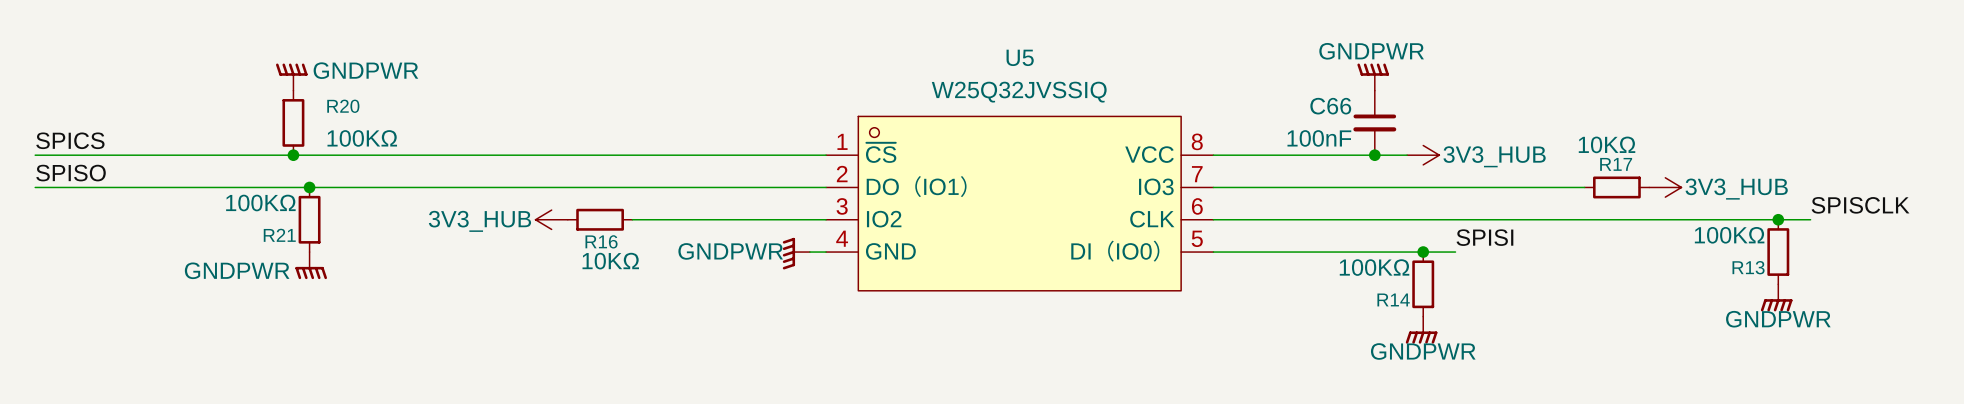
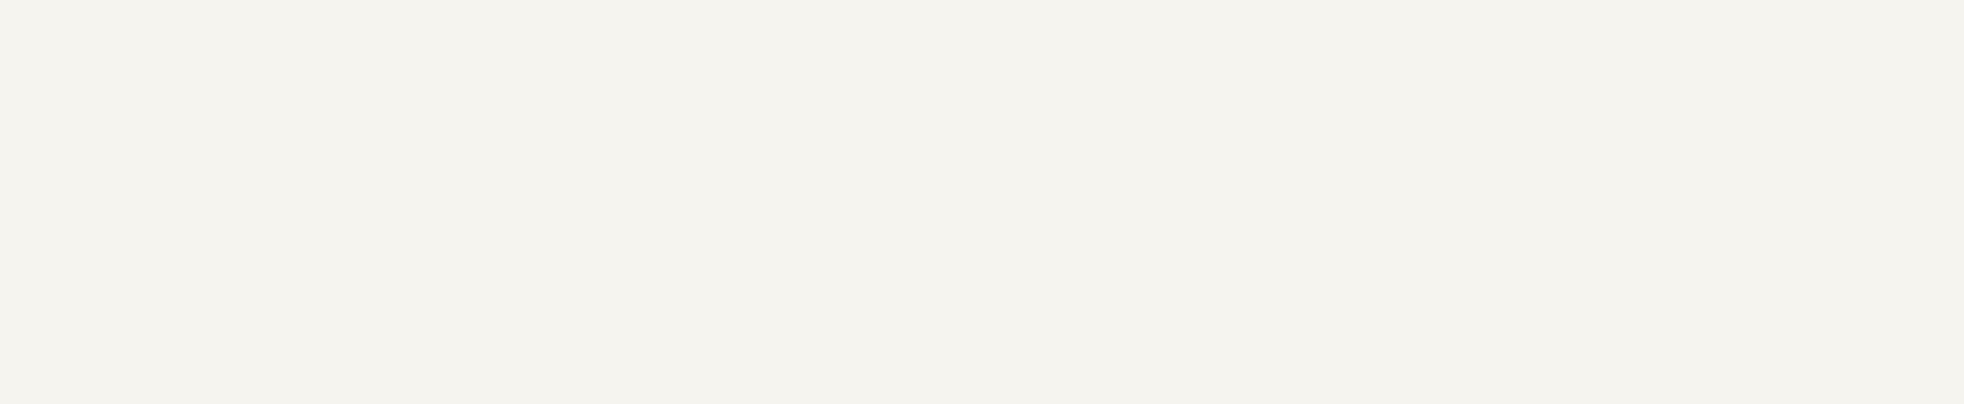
power symbol: GNDPWR (291, 77) -> none
power symbol: GNDPWR (1373, 77) -> none
R20: 100KΩ (293, 122) -> none
C66: 100nF (1374, 122) -> none
label: SPICS (70, 140) -> none
wire: (35, 155) (826, 155) -> none
junction: (293, 155) -> none
wire: (1213, 155) (1407, 155) -> none
junction: (1374, 155) -> none
power symbol: 3V3_HUB (1423, 155) -> none
label: SPISO (71, 173) -> none
wire: (35, 187) (826, 187) -> none
junction: (309, 187) -> none
wire: (1213, 187) (1584, 187) -> none
R17: 10KΩ (1616, 187) -> none
power symbol: 3V3_HUB (1665, 187) -> none
U5: W25Q32JVSSIQ (1019, 203) -> none
label: SPISCLK (1860, 205) -> none
R21: 100KΩ (309, 219) -> none
power symbol: 3V3_HUB (551, 219) -> none
R16: 10KΩ (600, 219) -> none
wire: (632, 219) (826, 219) -> none
wire: (1213, 219) (1810, 219) -> none
junction: (1778, 219) -> none
label: SPISI (1484, 237) -> none
wire: (809, 252) (826, 252) -> none
wire: (1213, 252) (1455, 252) -> none
junction: (1423, 252) -> none
R13: 100KΩ (1778, 252) -> none
power symbol: GNDPWR (796, 253) -> none
power symbol: GNDPWR (311, 265) -> none
R14: 100KΩ (1423, 284) -> none
power symbol: GNDPWR (1776, 297) -> none
power symbol: GNDPWR (1421, 330) -> none

